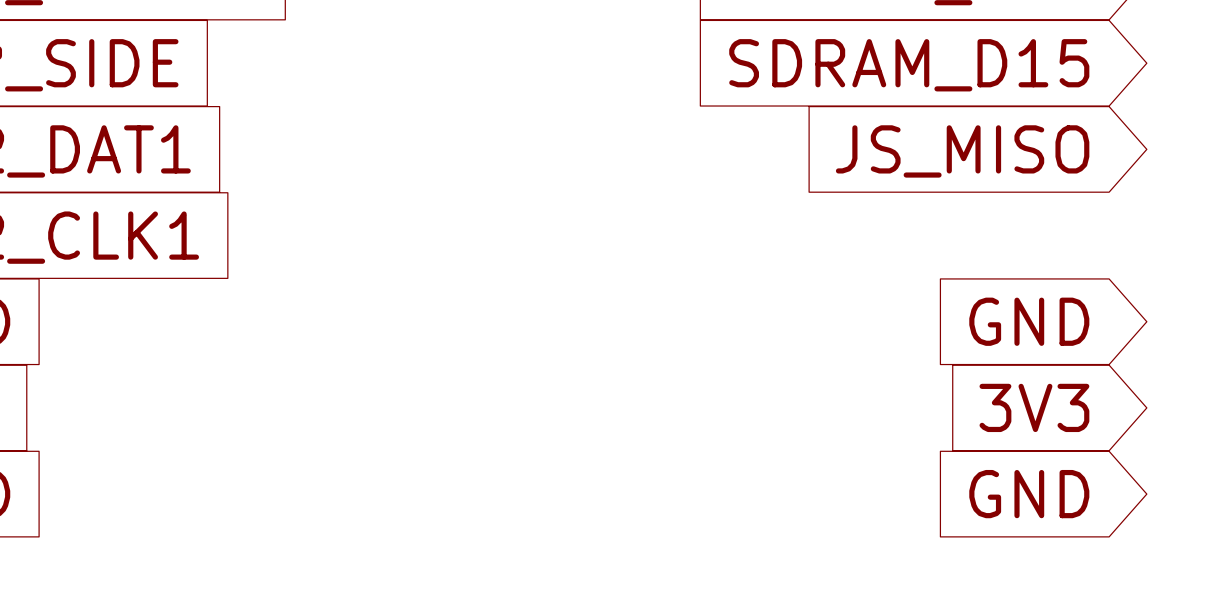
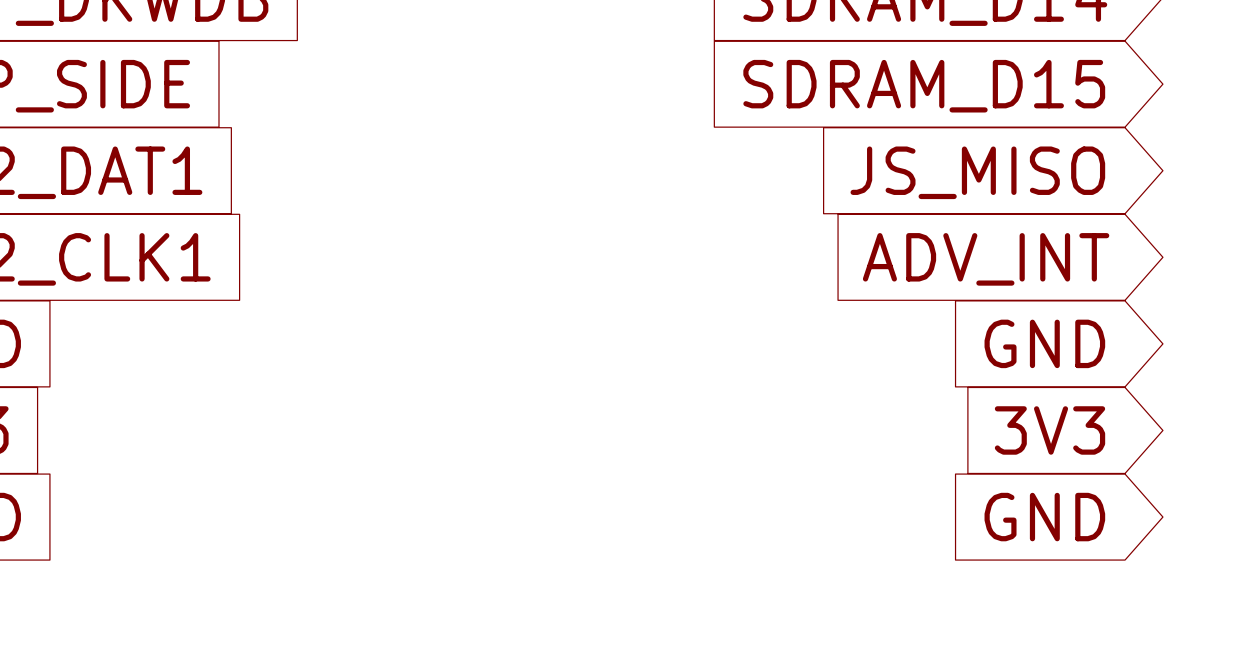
global label: none -> ADV_INT (986, 259)

